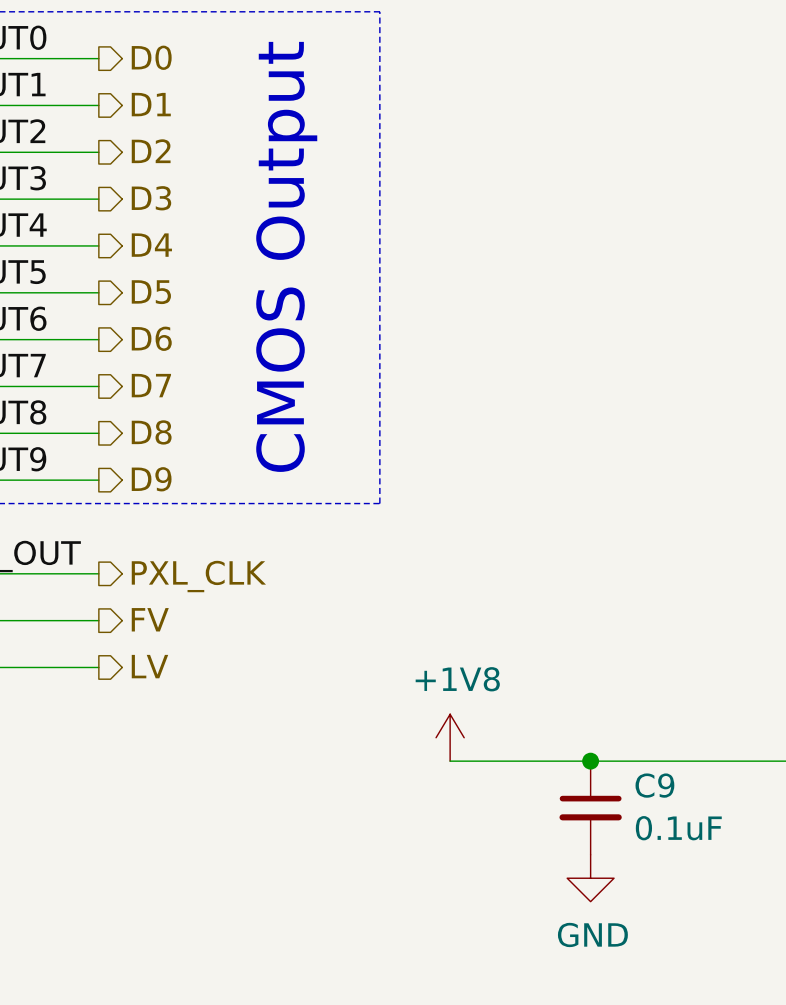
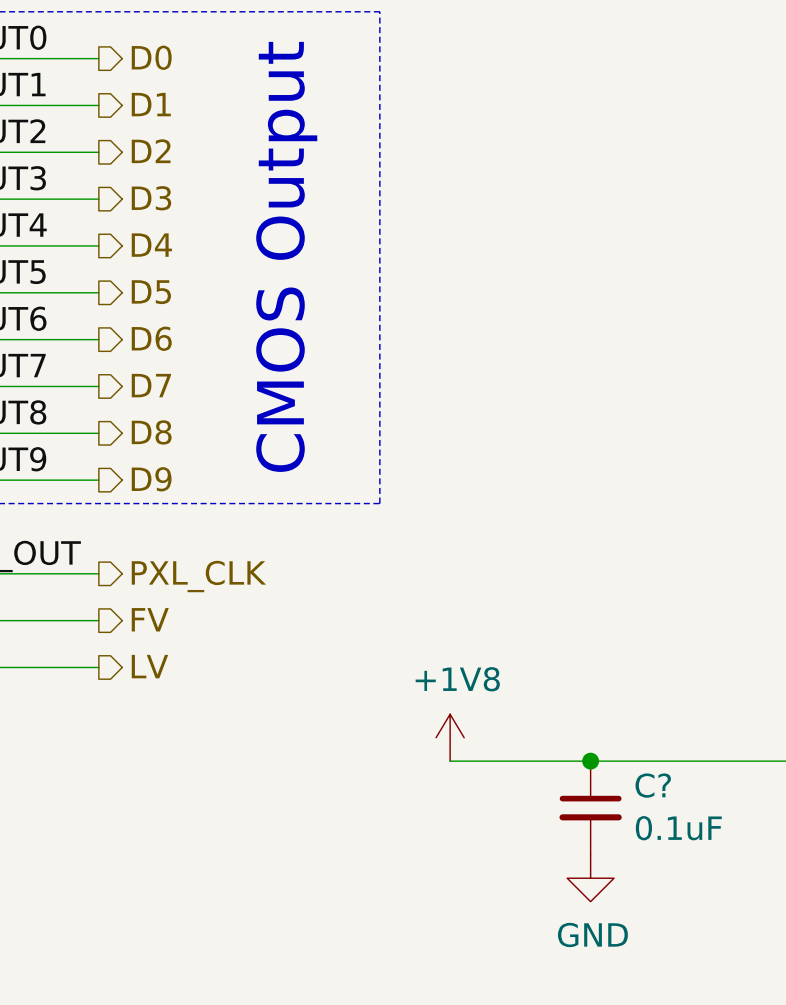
C9 name: C9 (654, 785) -> C? (653, 785)

